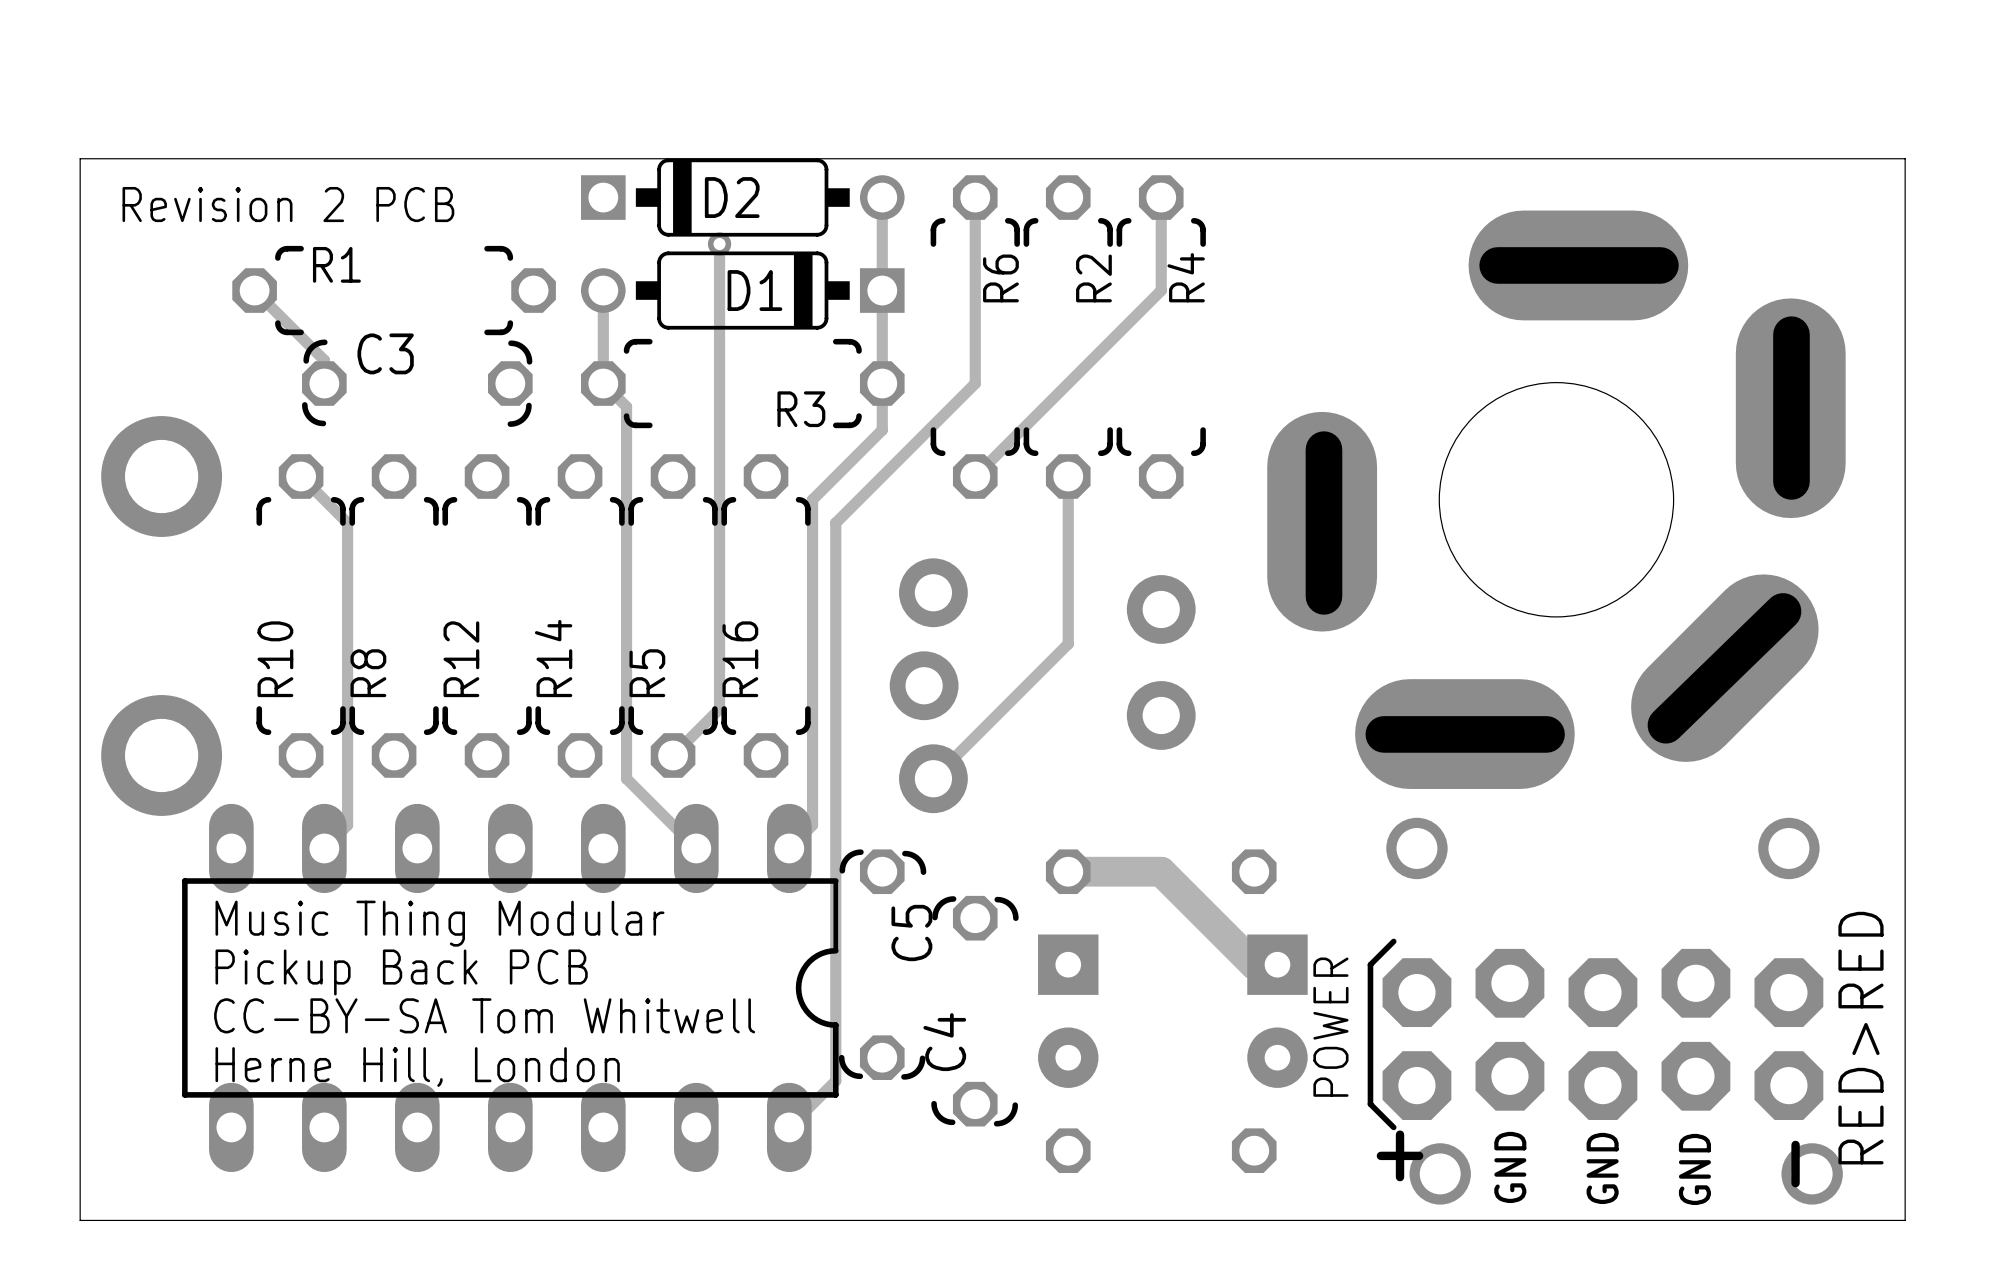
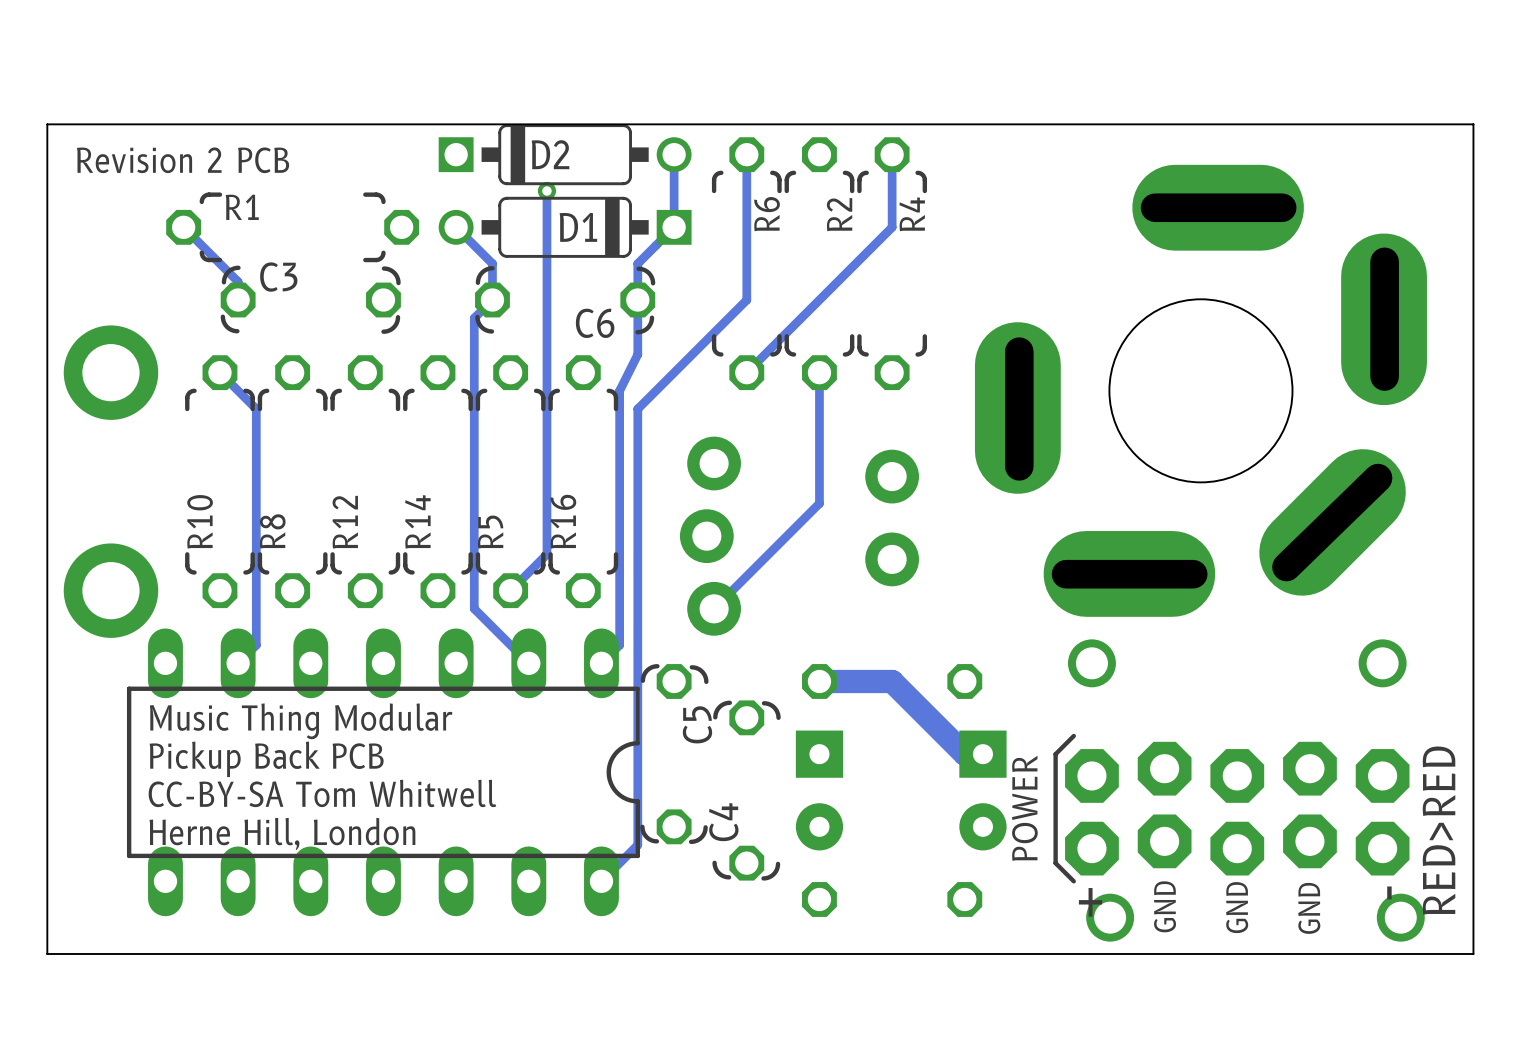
track: (603, 290) (603, 383) (626, 406) -> (456, 227) (492, 263) (492, 300) (474, 318)
track: (882, 290) (882, 430) (812, 499) -> (674, 227) (637, 263) (637, 354) (619, 390)
R3: (742, 383) -> none
C6: none -> (565, 300)

